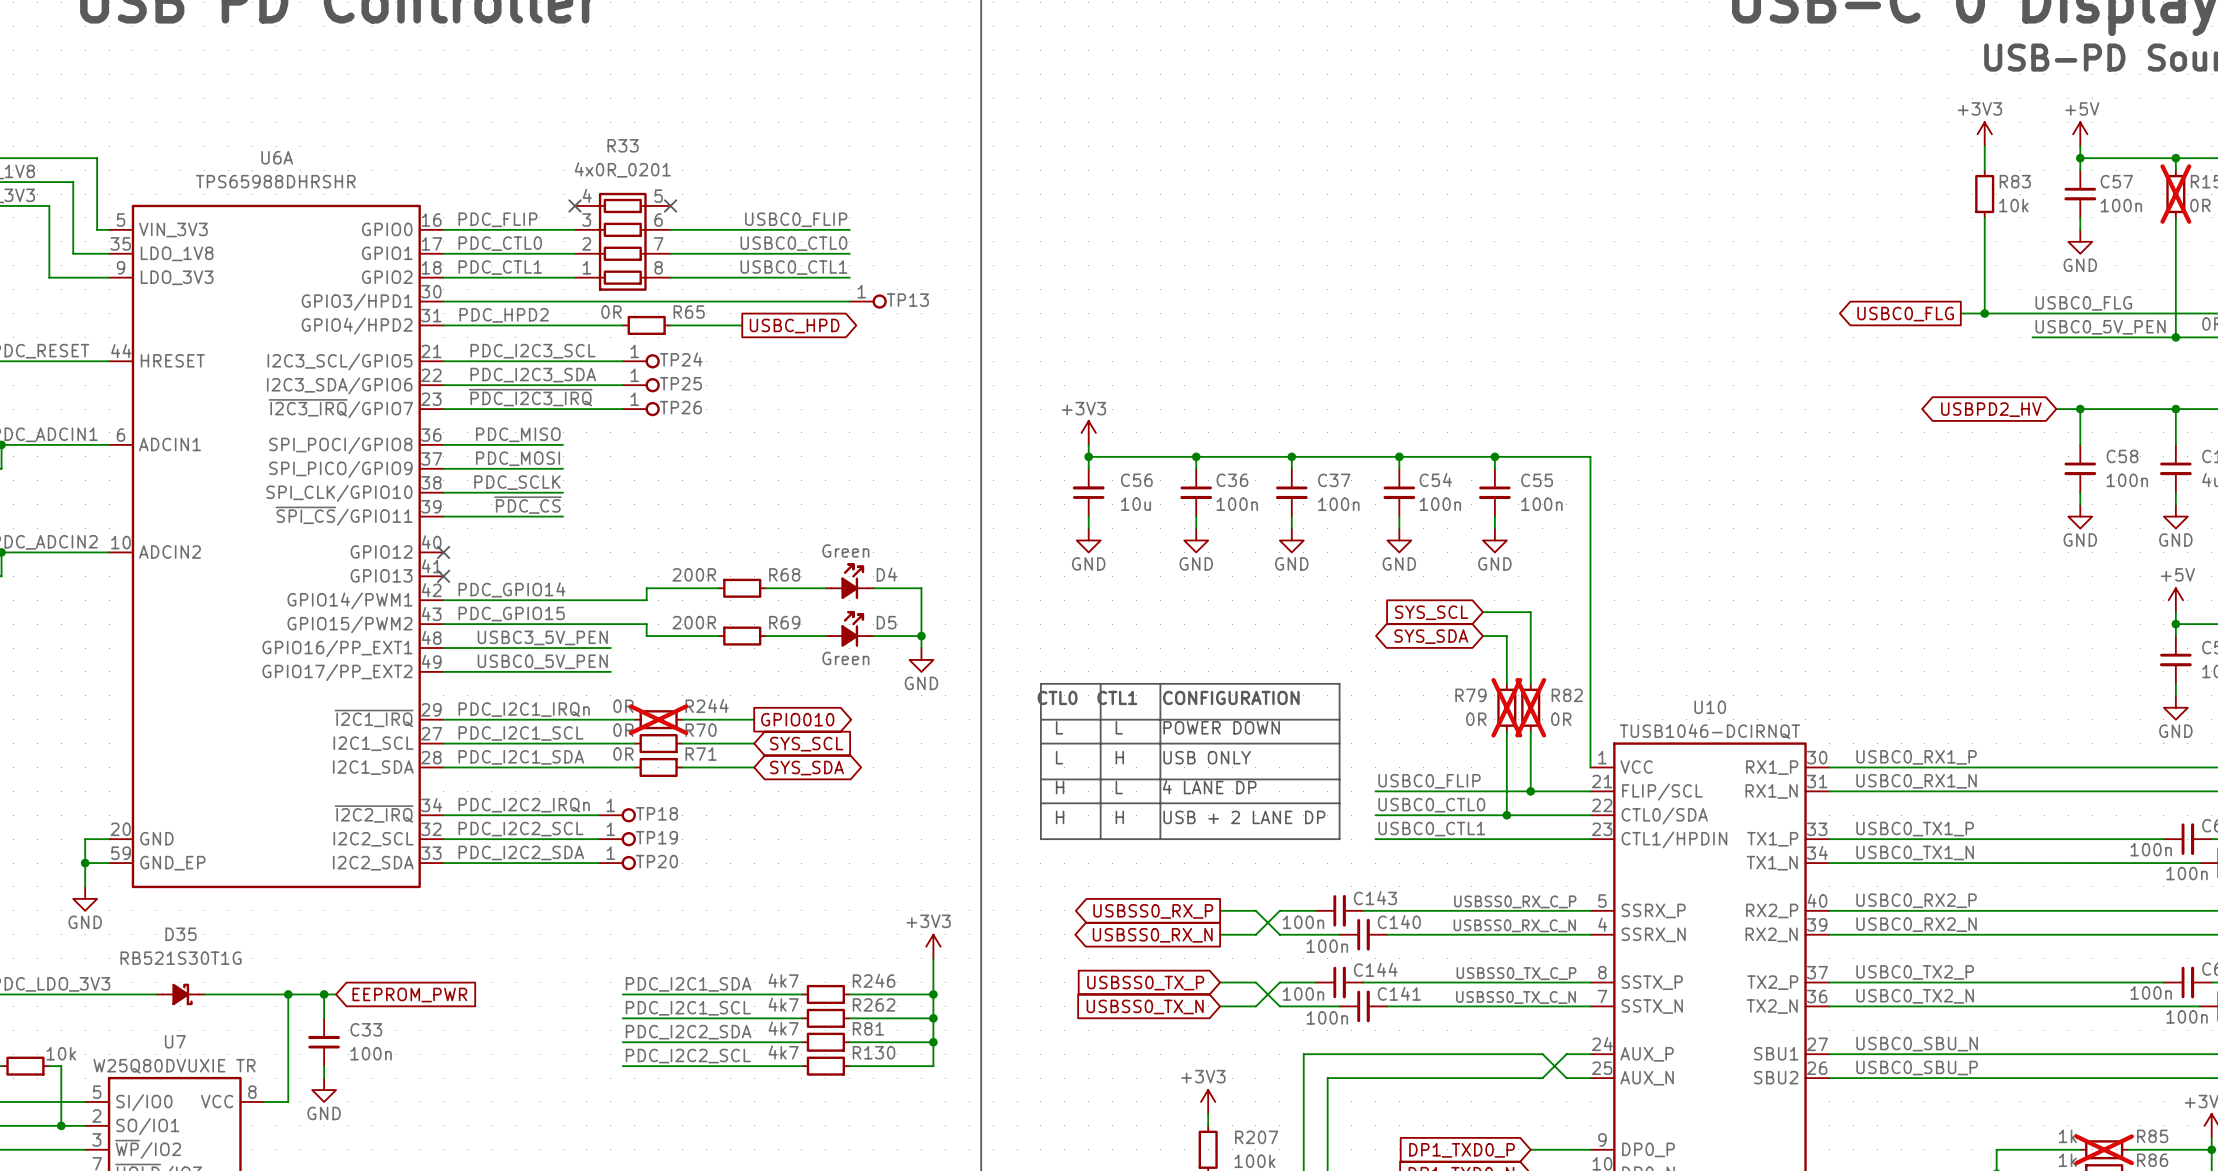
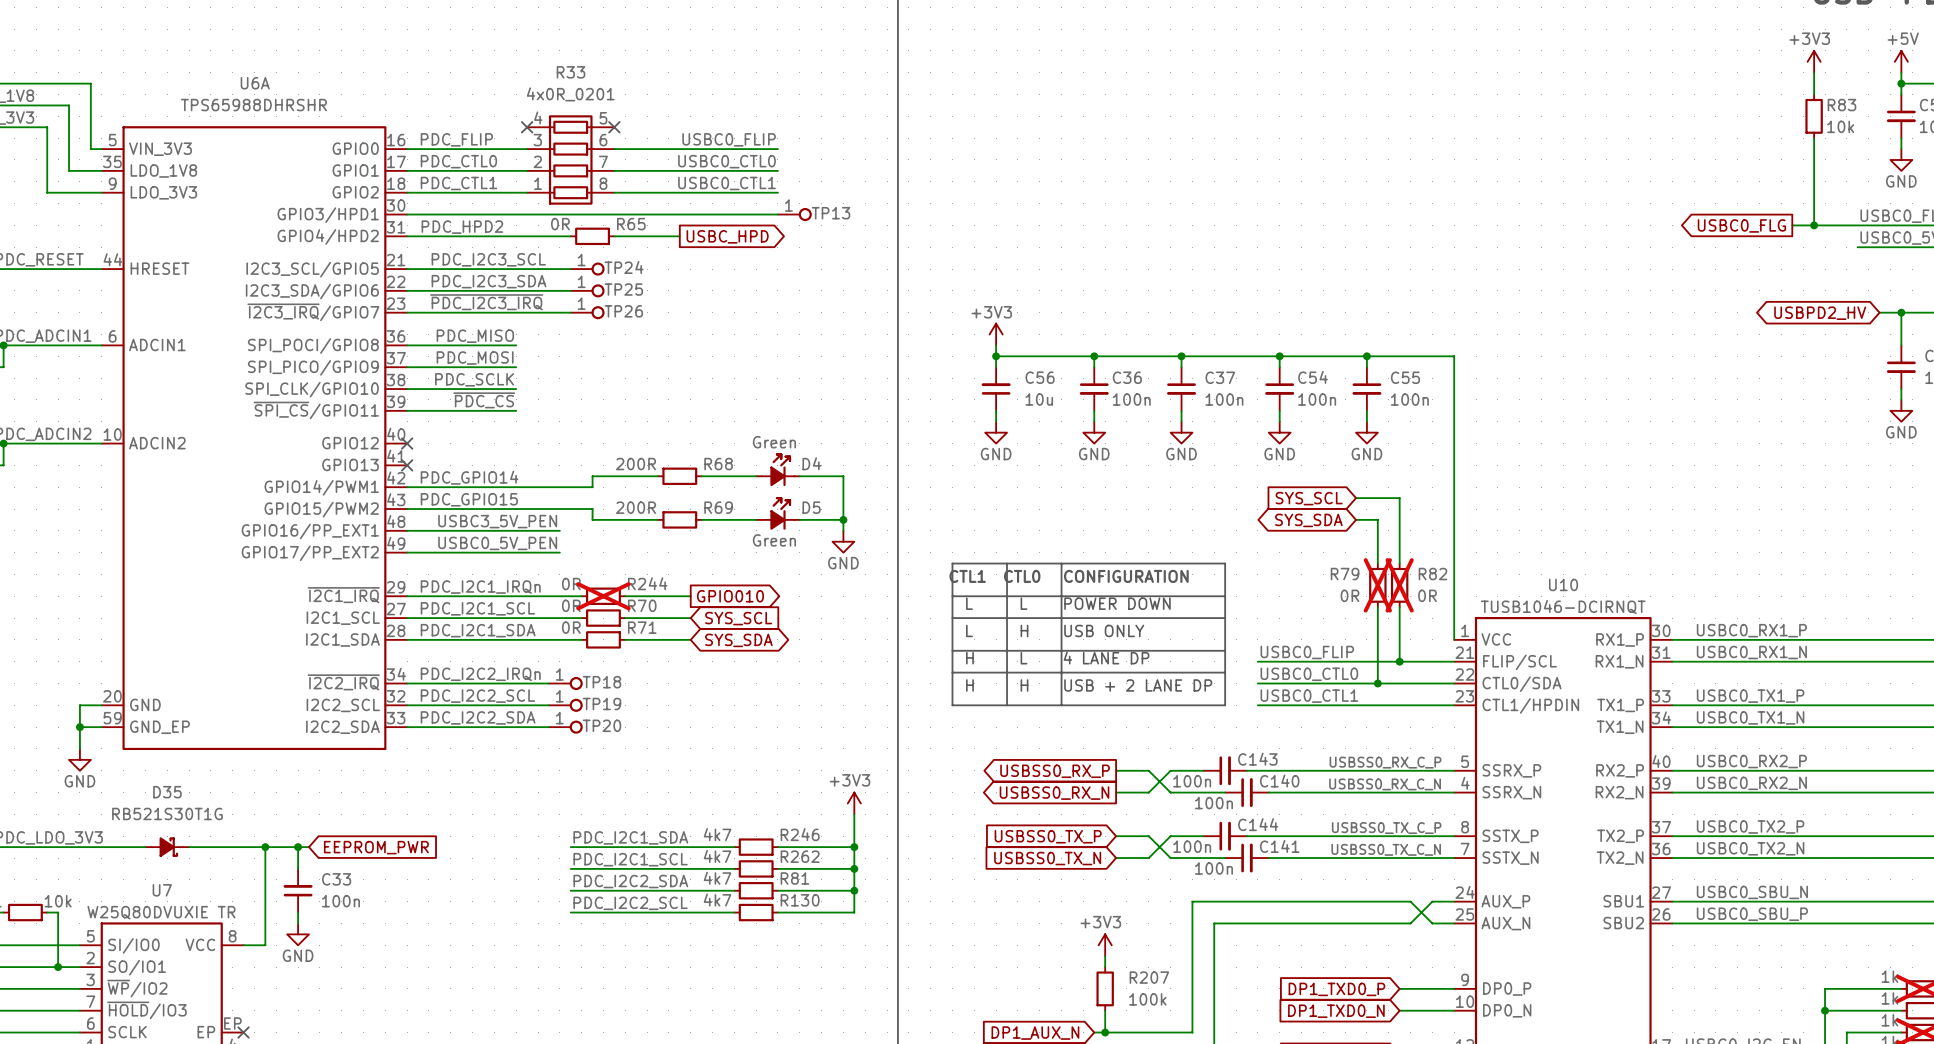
text: CTL0 (1057, 697) -> CTL1 (967, 576)
text: CTL1 (1117, 697) -> CTL0 (1022, 576)

